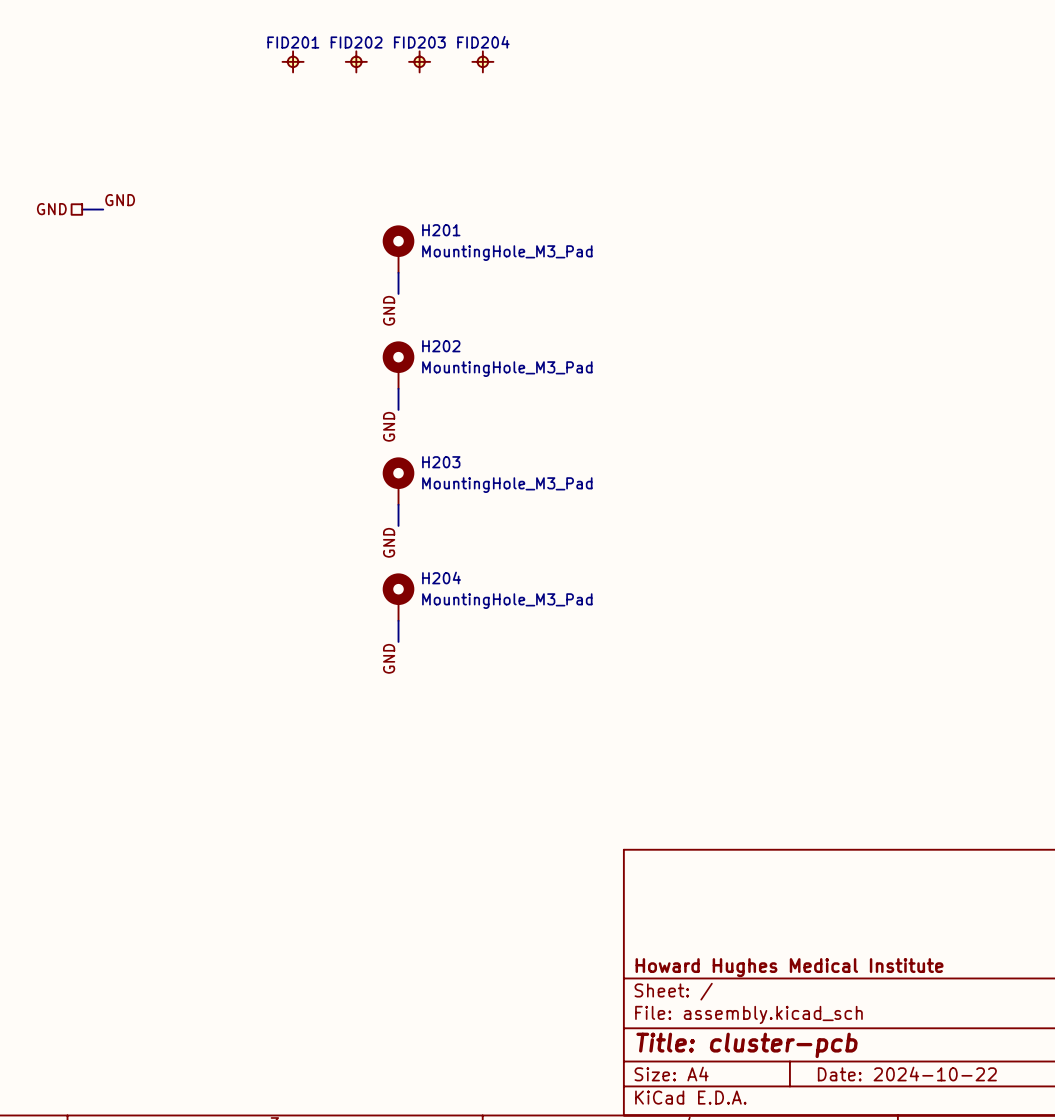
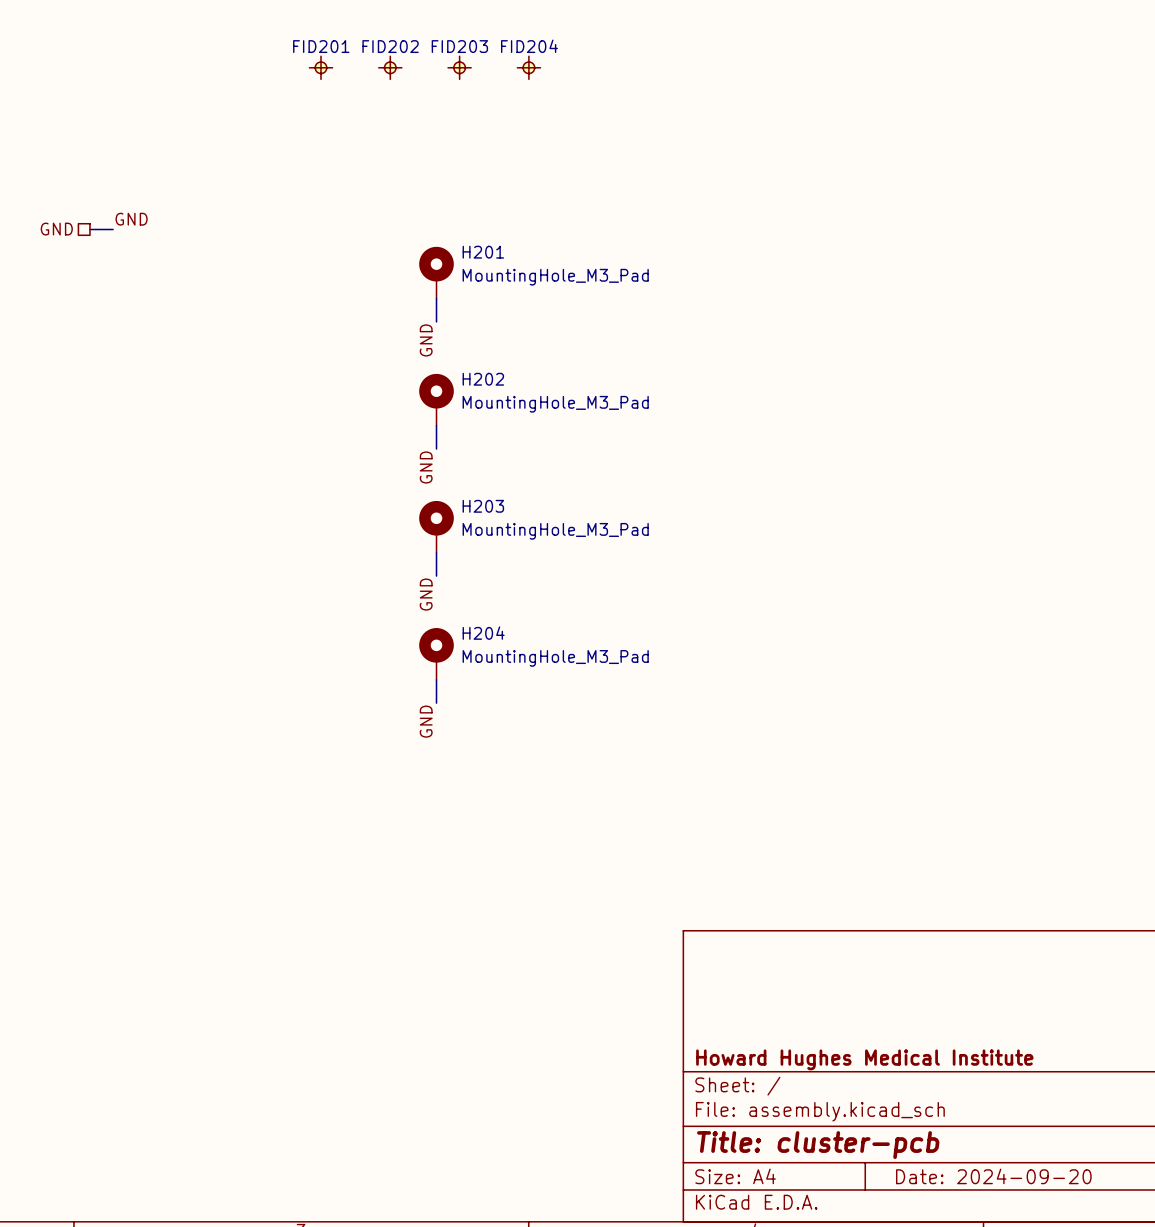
title block: Date: 2024-10-22 (907, 1074) -> Date: 2024-09-20 (993, 1176)

